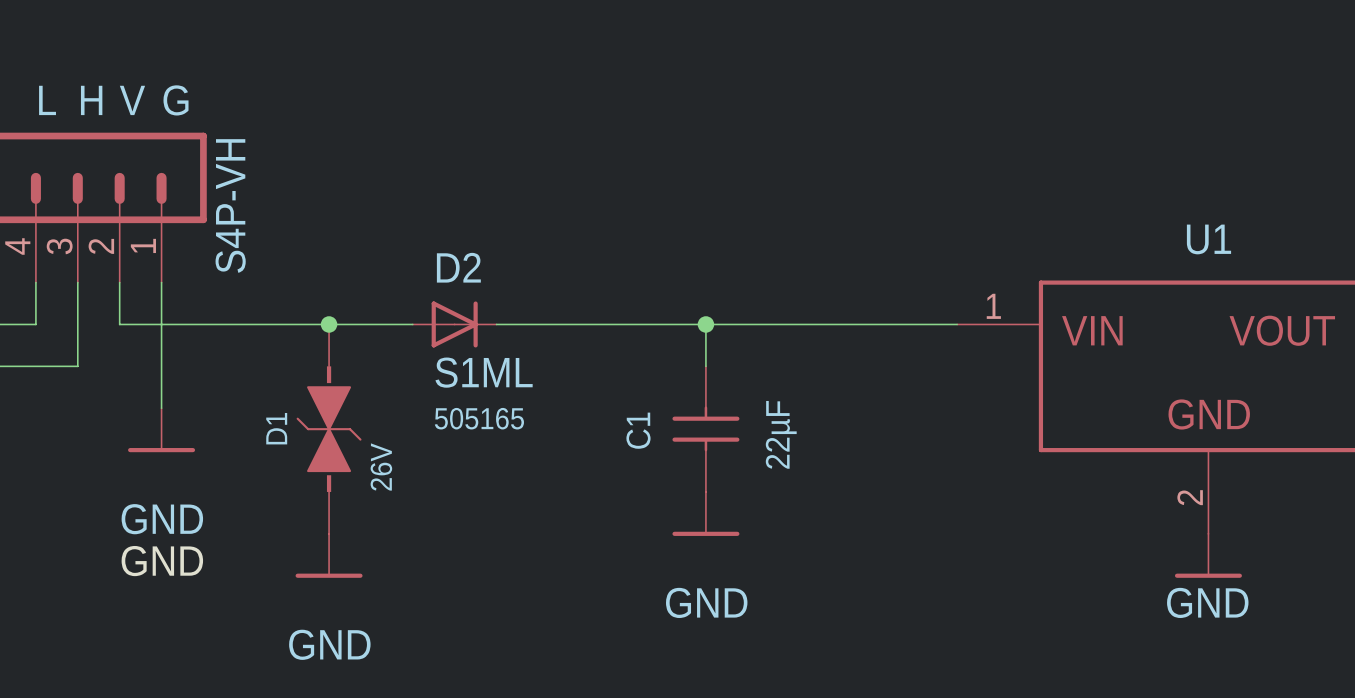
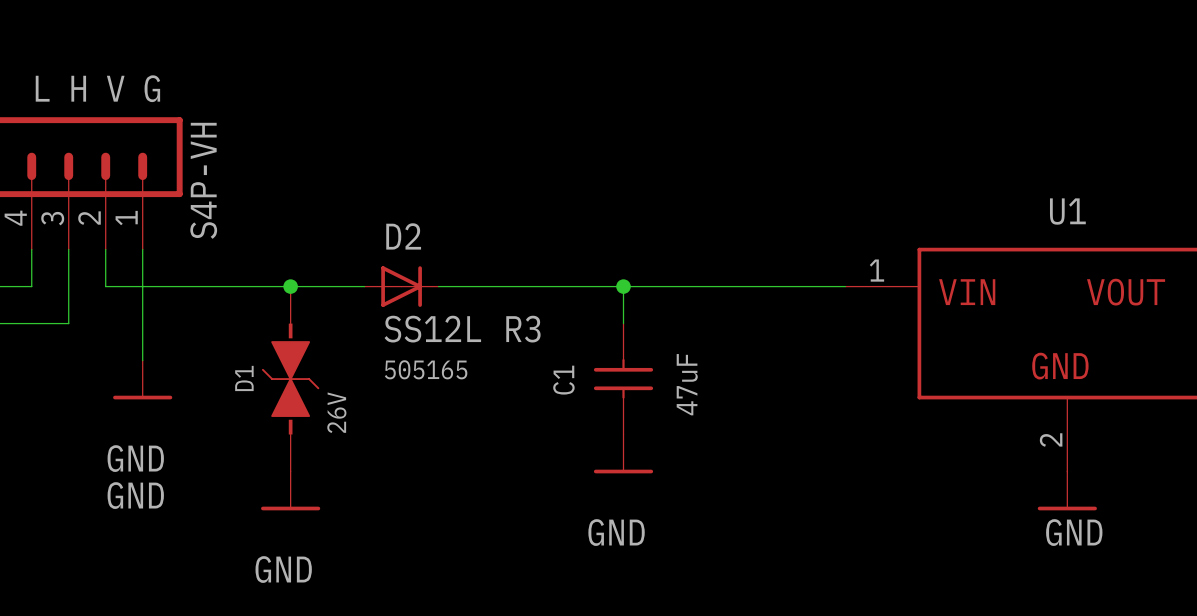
D2 value: S1ML (484, 372) -> SS12L R3 (462, 329)
C1 value: 22µF (781, 434) -> 47uF (687, 384)

